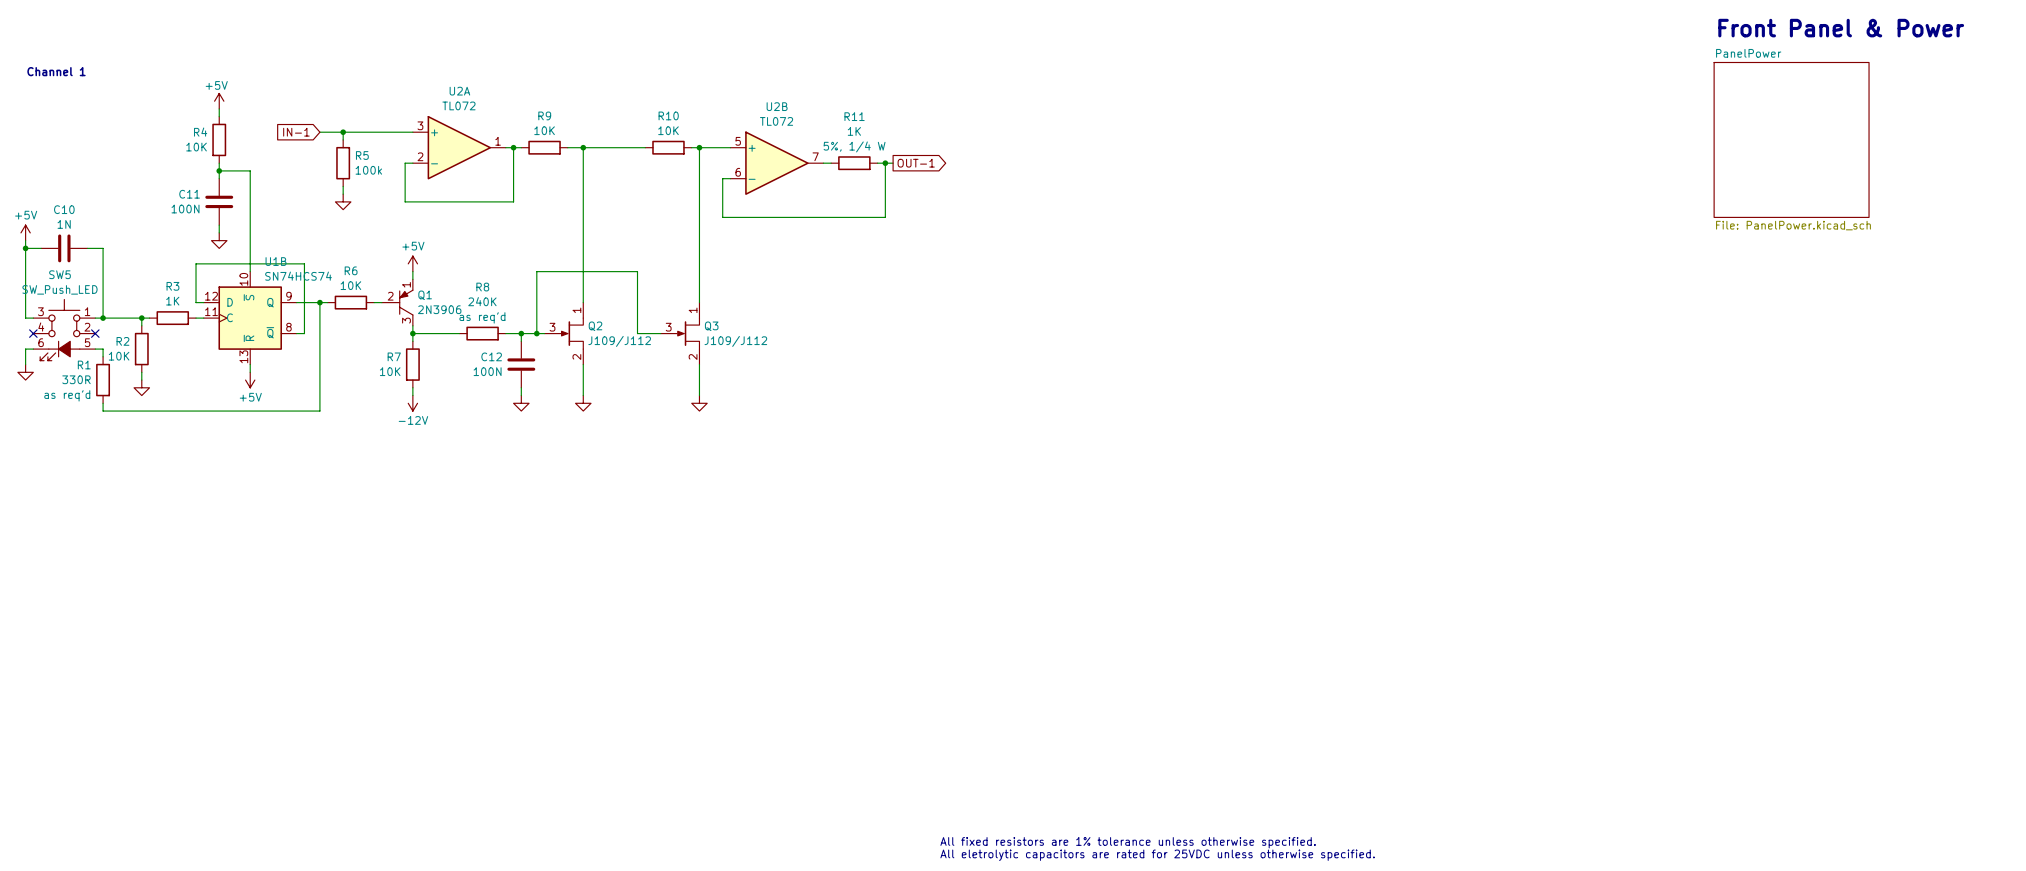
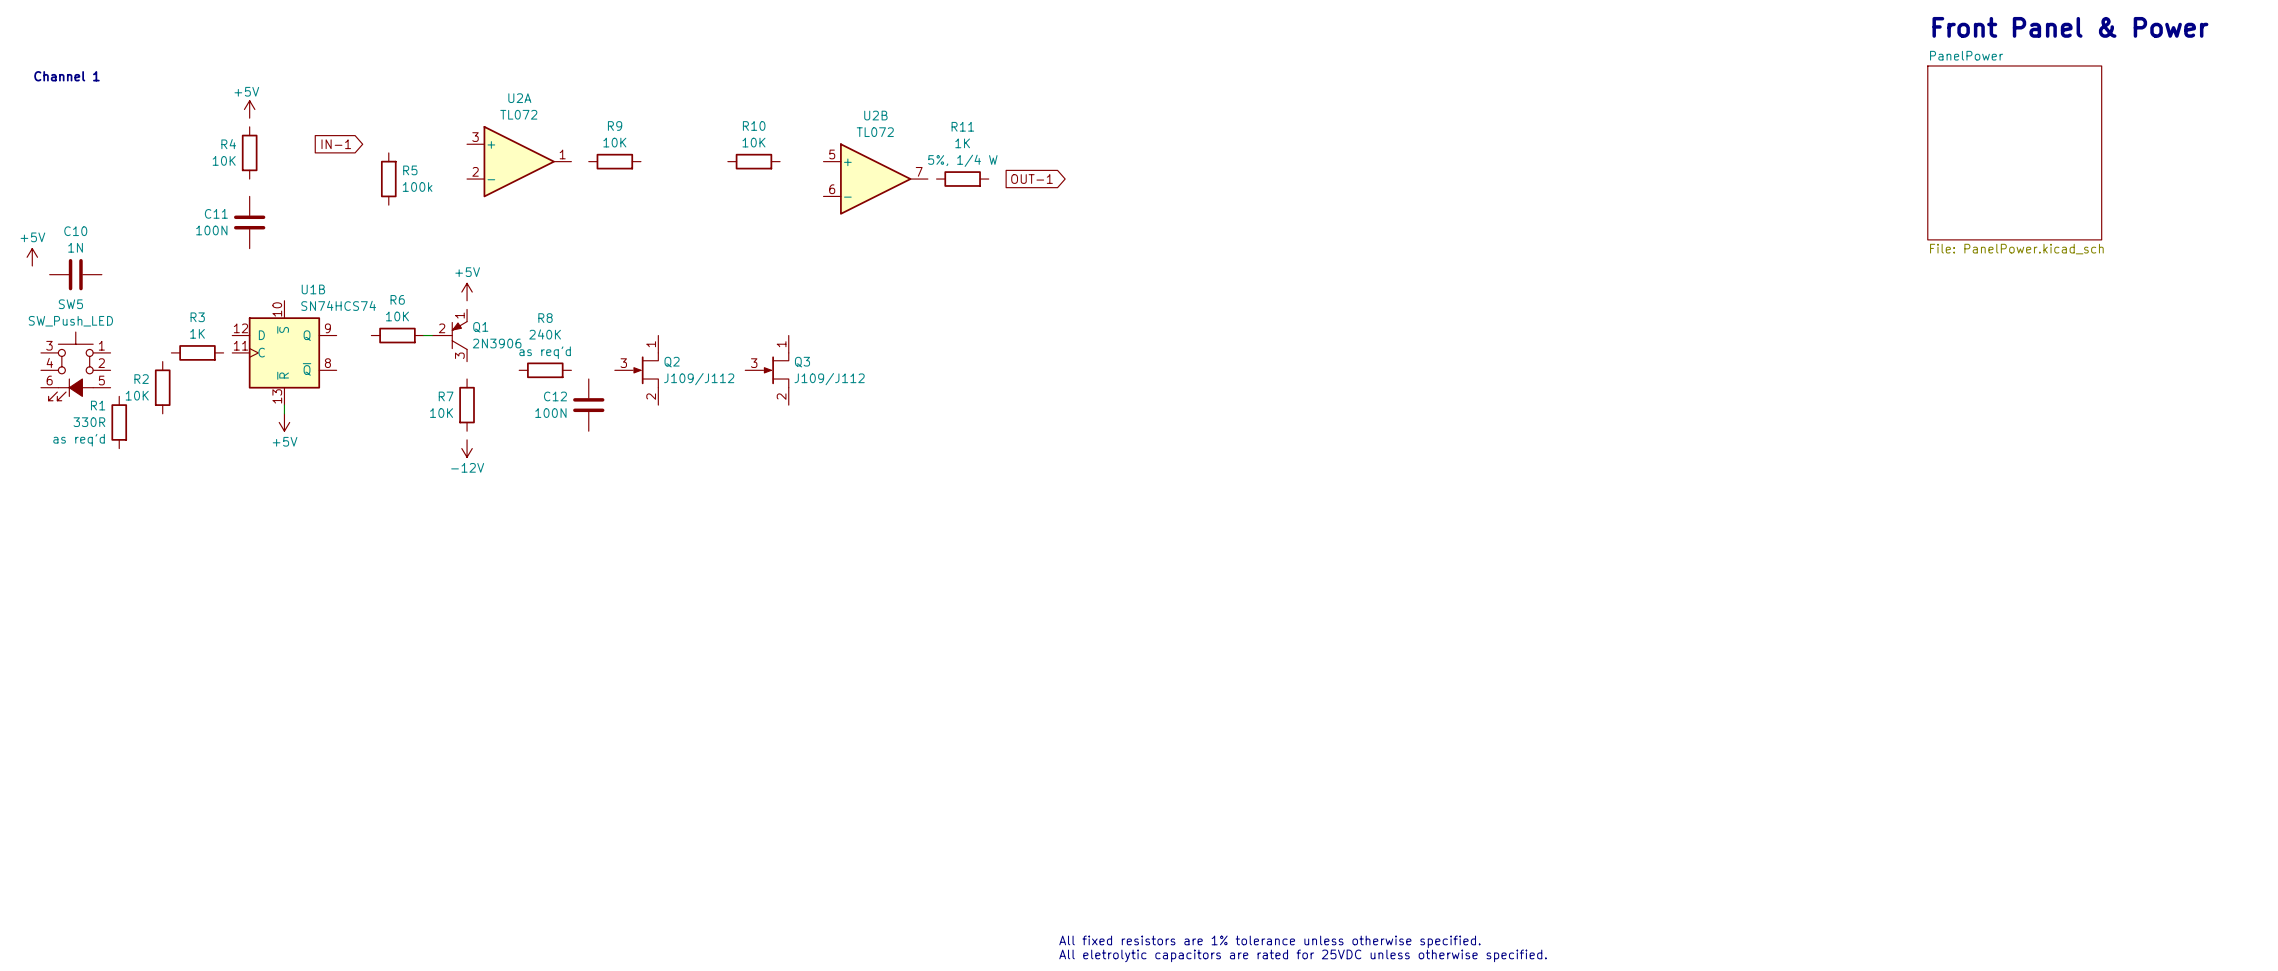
wire: (219, 108) (219, 116) -> none
wire: (319, 132) (412, 132) -> none
wire: (343, 132) (343, 139) -> none
junction: (343, 132) -> none
wire: (505, 147) (521, 147) -> none
wire: (513, 147) (513, 201) (405, 201) (405, 163) (412, 163) -> none
junction: (513, 147) -> none
wire: (567, 147) (645, 147) -> none
wire: (583, 147) (583, 302) -> none
junction: (583, 147) -> none
wire: (691, 147) (730, 147) -> none
wire: (699, 147) (699, 302) -> none
junction: (699, 147) -> none
wire: (219, 163) (219, 178) -> none
wire: (823, 163) (831, 163) -> none
wire: (877, 163) (893, 163) -> none
wire: (885, 163) (885, 217) (722, 217) (722, 178) (730, 178) -> none
junction: (885, 163) -> none
wire: (219, 170) (250, 170) (250, 271) -> none
junction: (219, 170) -> none
wire: (343, 186) (343, 194) -> none
power symbol: (343, 201) -> none
wire: (219, 225) (219, 232) -> none
wire: (25, 240) (25, 318) (33, 318) -> none
power symbol: (219, 240) -> none
wire: (25, 248) (41, 248) -> none
junction: (25, 248) -> none
wire: (87, 248) (103, 248) (103, 318) -> none
wire: (412, 271) (412, 279) -> none
wire: (203, 302) (196, 302) (196, 263) (304, 263) (304, 333) (296, 333) -> none
wire: (296, 302) (327, 302) -> none
wire: (319, 302) (319, 411) (103, 411) (103, 403) -> none
junction: (319, 302) -> none
wire: (95, 318) (149, 318) -> none
junction: (103, 318) -> none
wire: (141, 318) (141, 325) -> none
junction: (141, 318) -> none
wire: (196, 318) (203, 318) -> none
wire: (412, 325) (412, 341) -> none
no-connect mark: (33, 333) -> none
no-connect mark: (95, 333) -> none
wire: (412, 333) (459, 333) -> none
junction: (412, 333) -> none
wire: (505, 333) (544, 333) -> none
wire: (521, 333) (521, 341) -> none
junction: (521, 333) -> none
wire: (536, 333) (536, 271) (637, 271) (637, 333) (660, 333) -> none
junction: (536, 333) -> none
wire: (33, 349) (25, 349) (25, 364) -> none
wire: (95, 349) (103, 349) (103, 356) -> none
wire: (583, 364) (583, 395) -> none
wire: (699, 364) (699, 395) -> none
power symbol: (25, 372) -> none
wire: (141, 372) (141, 380) -> none
power symbol: (141, 387) -> none
wire: (412, 387) (412, 395) -> none
wire: (521, 387) (521, 395) -> none
power symbol: (521, 403) -> none
power symbol: (583, 403) -> none
power symbol: (699, 403) -> none

